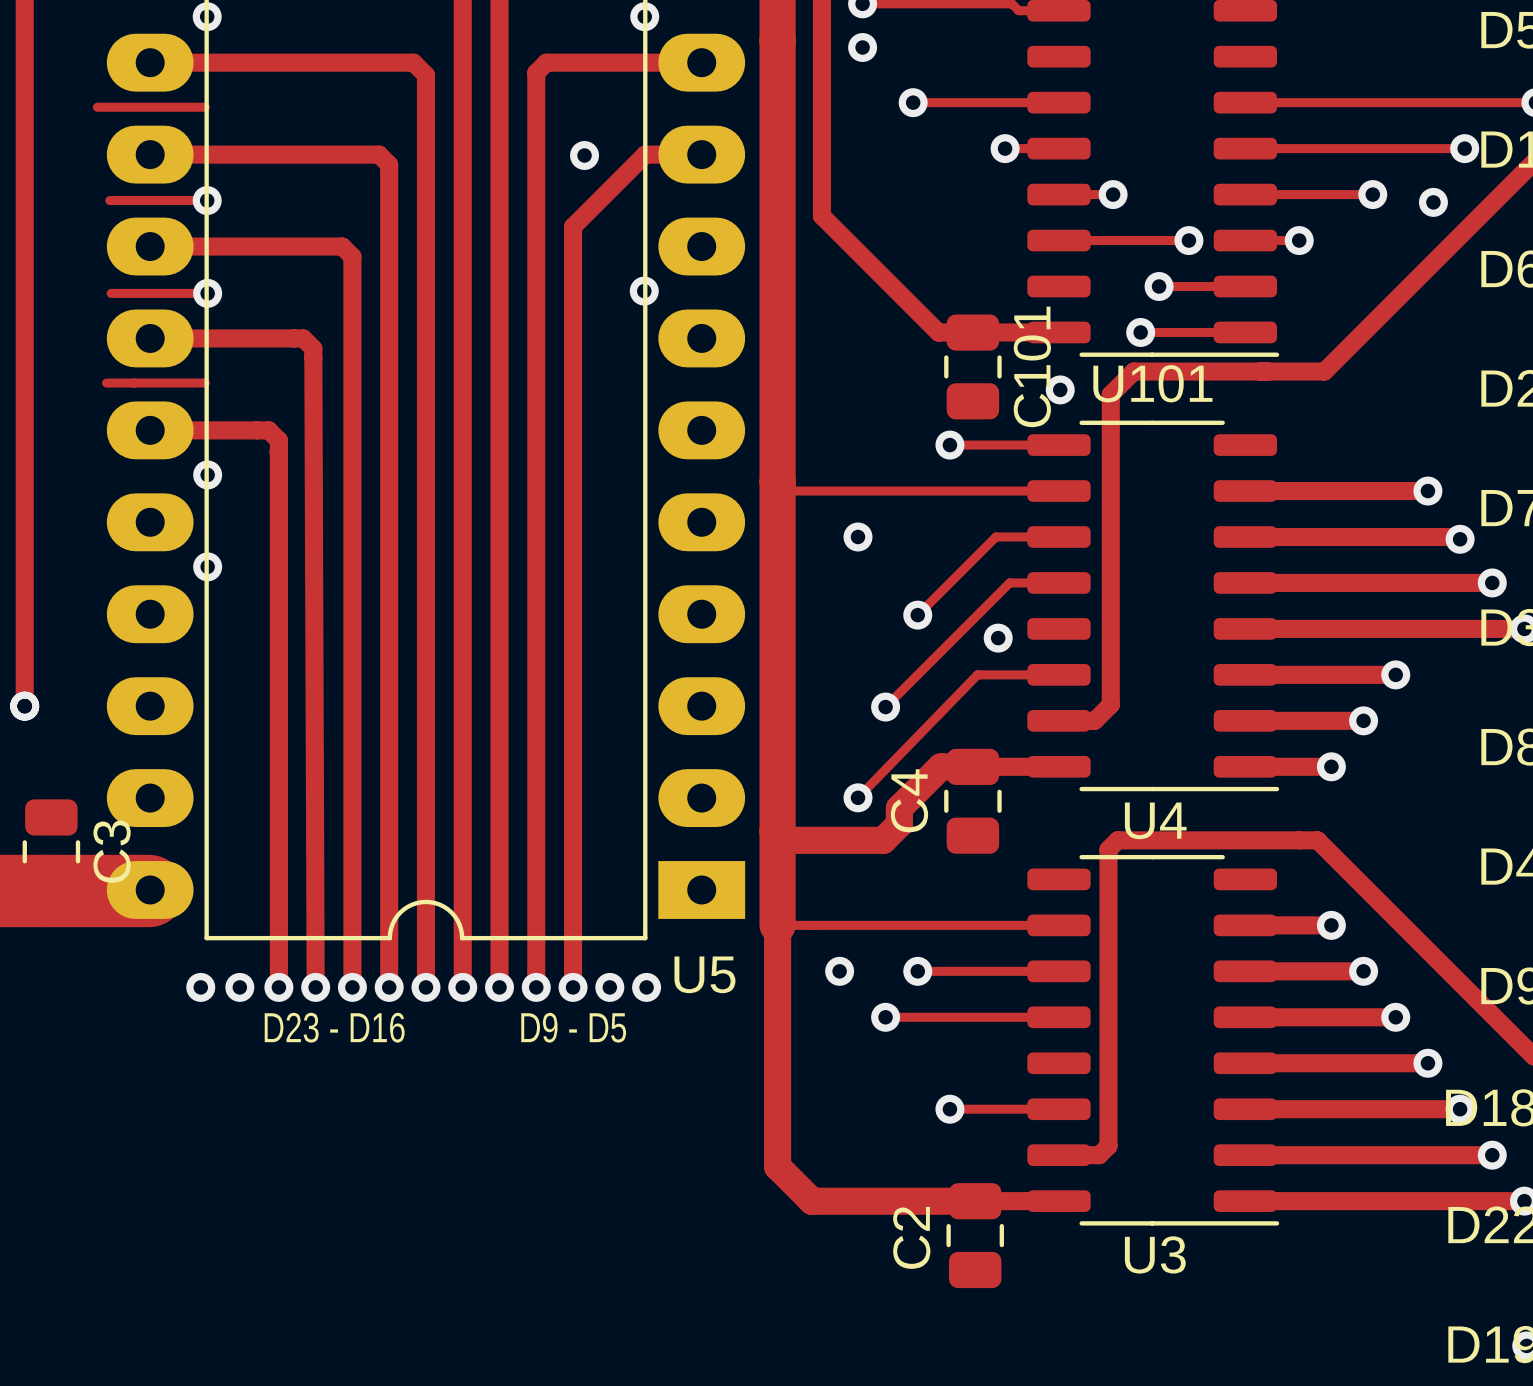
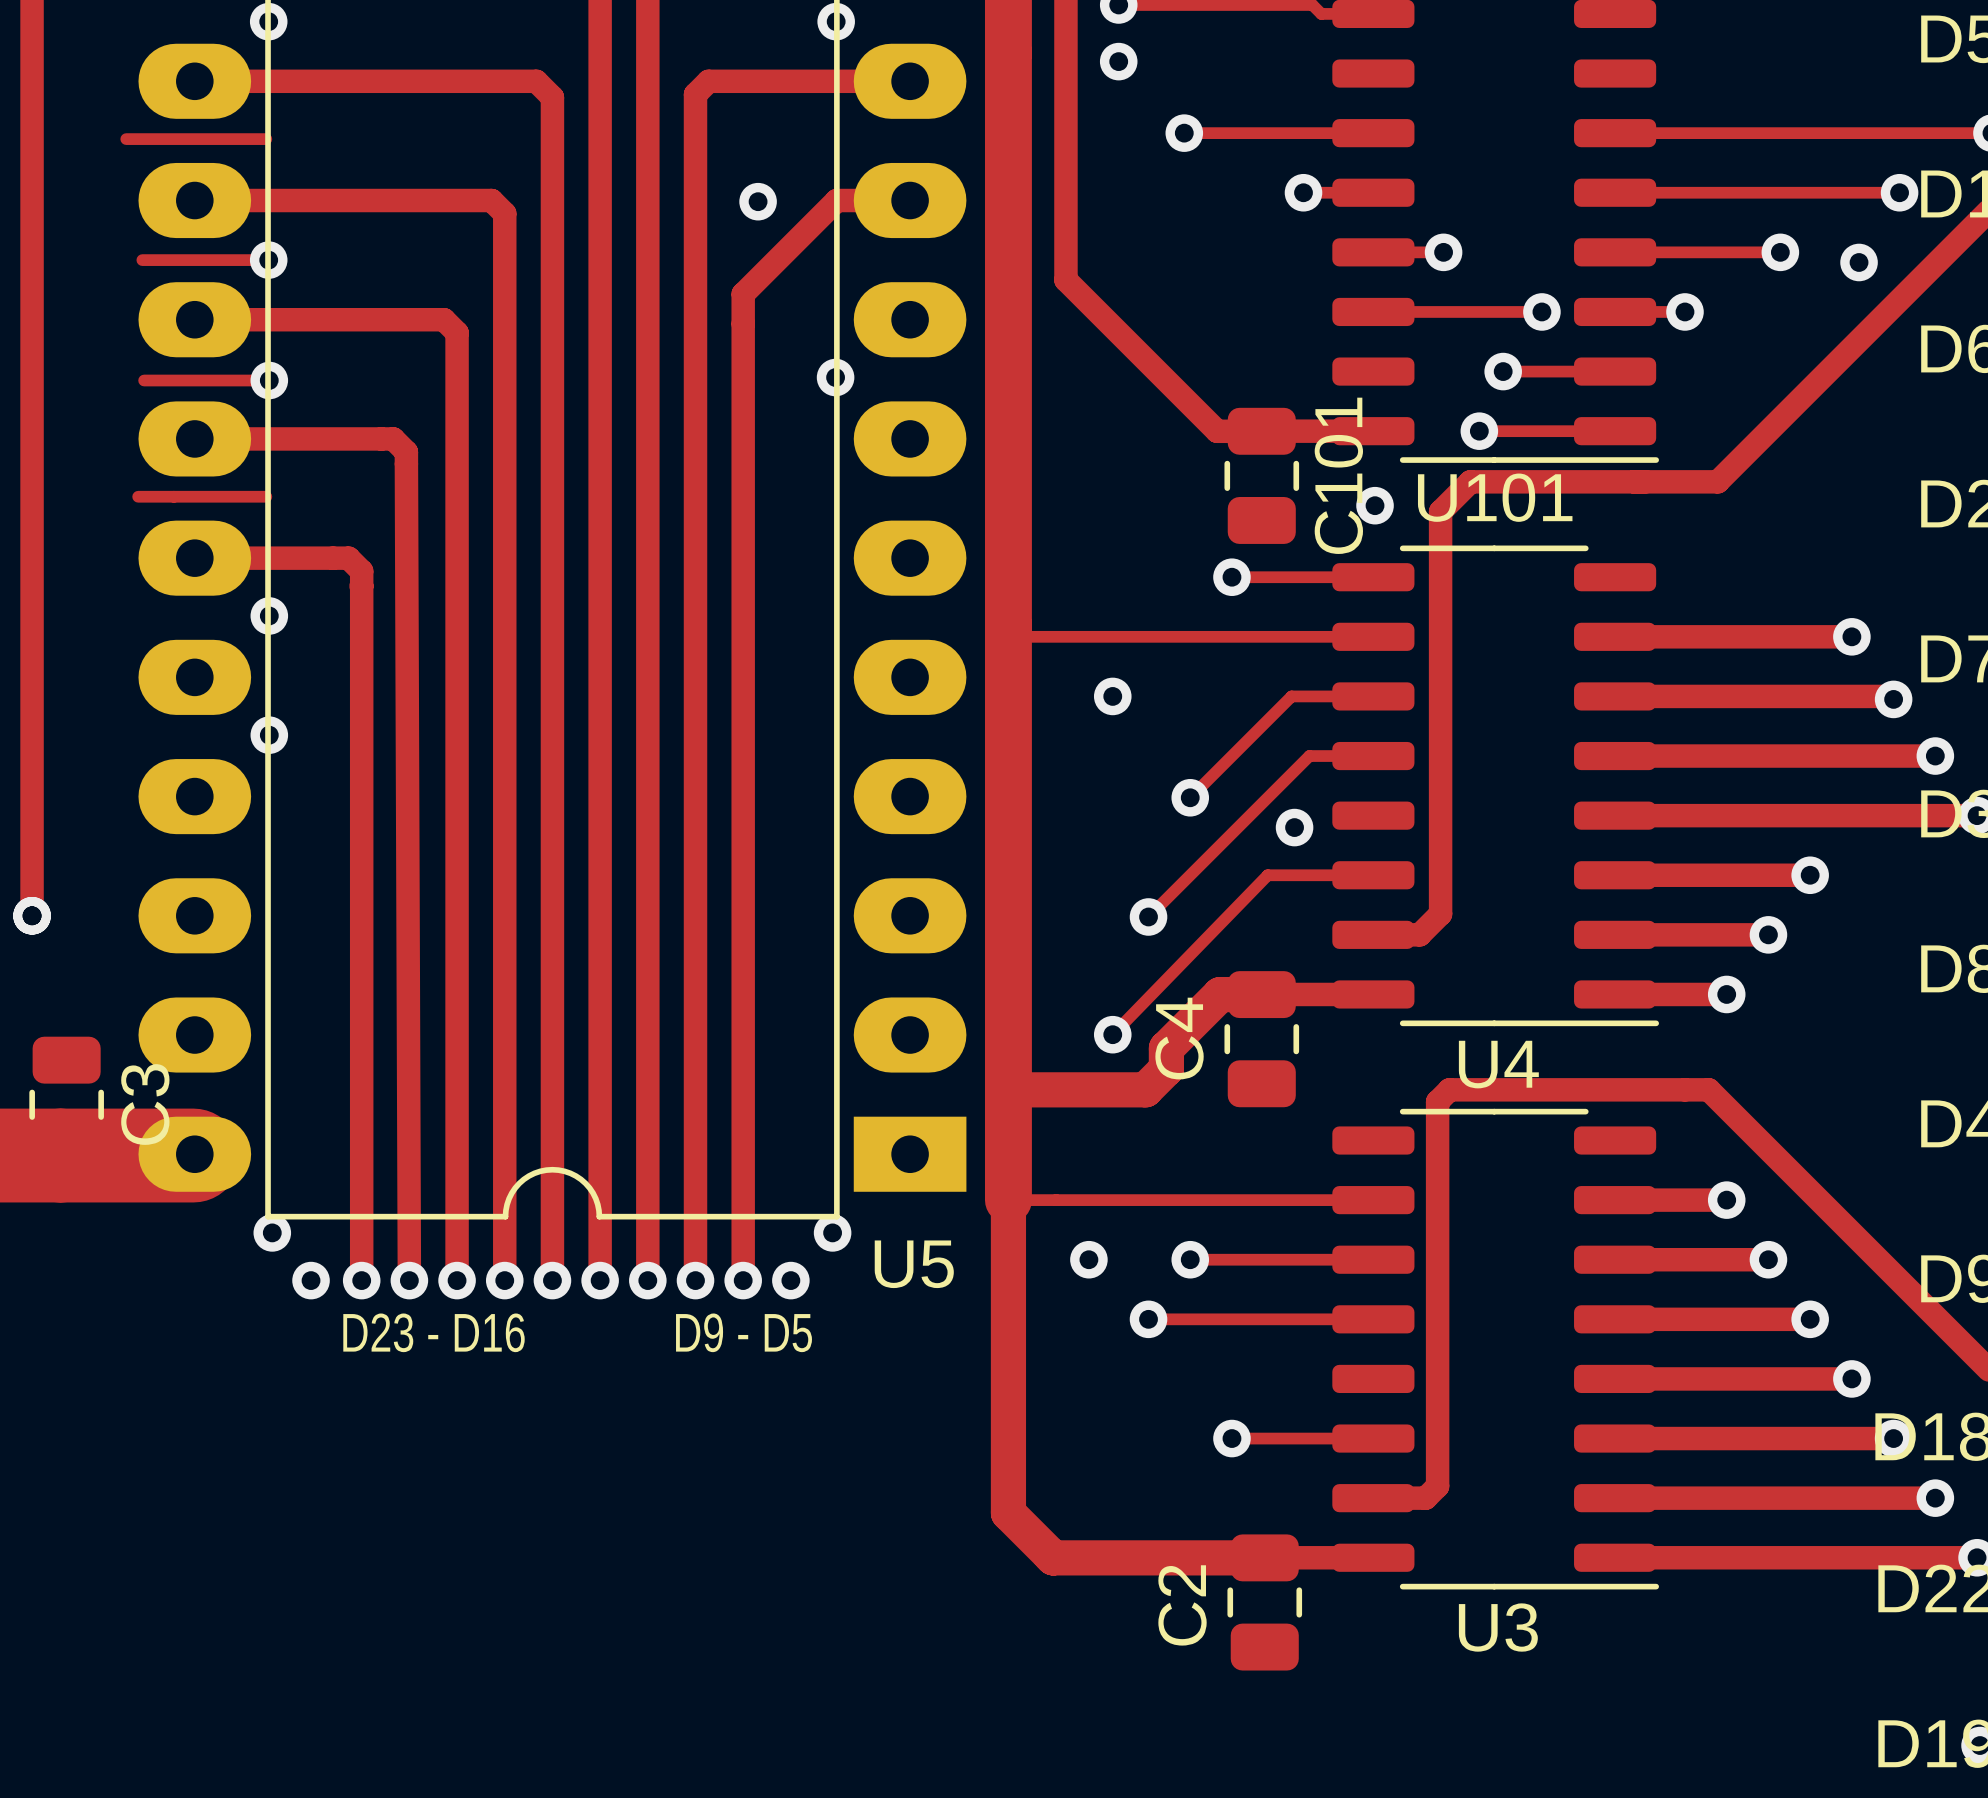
via position: (200, 987) -> (272, 1232)
via position: (646, 987) -> (832, 1232)

